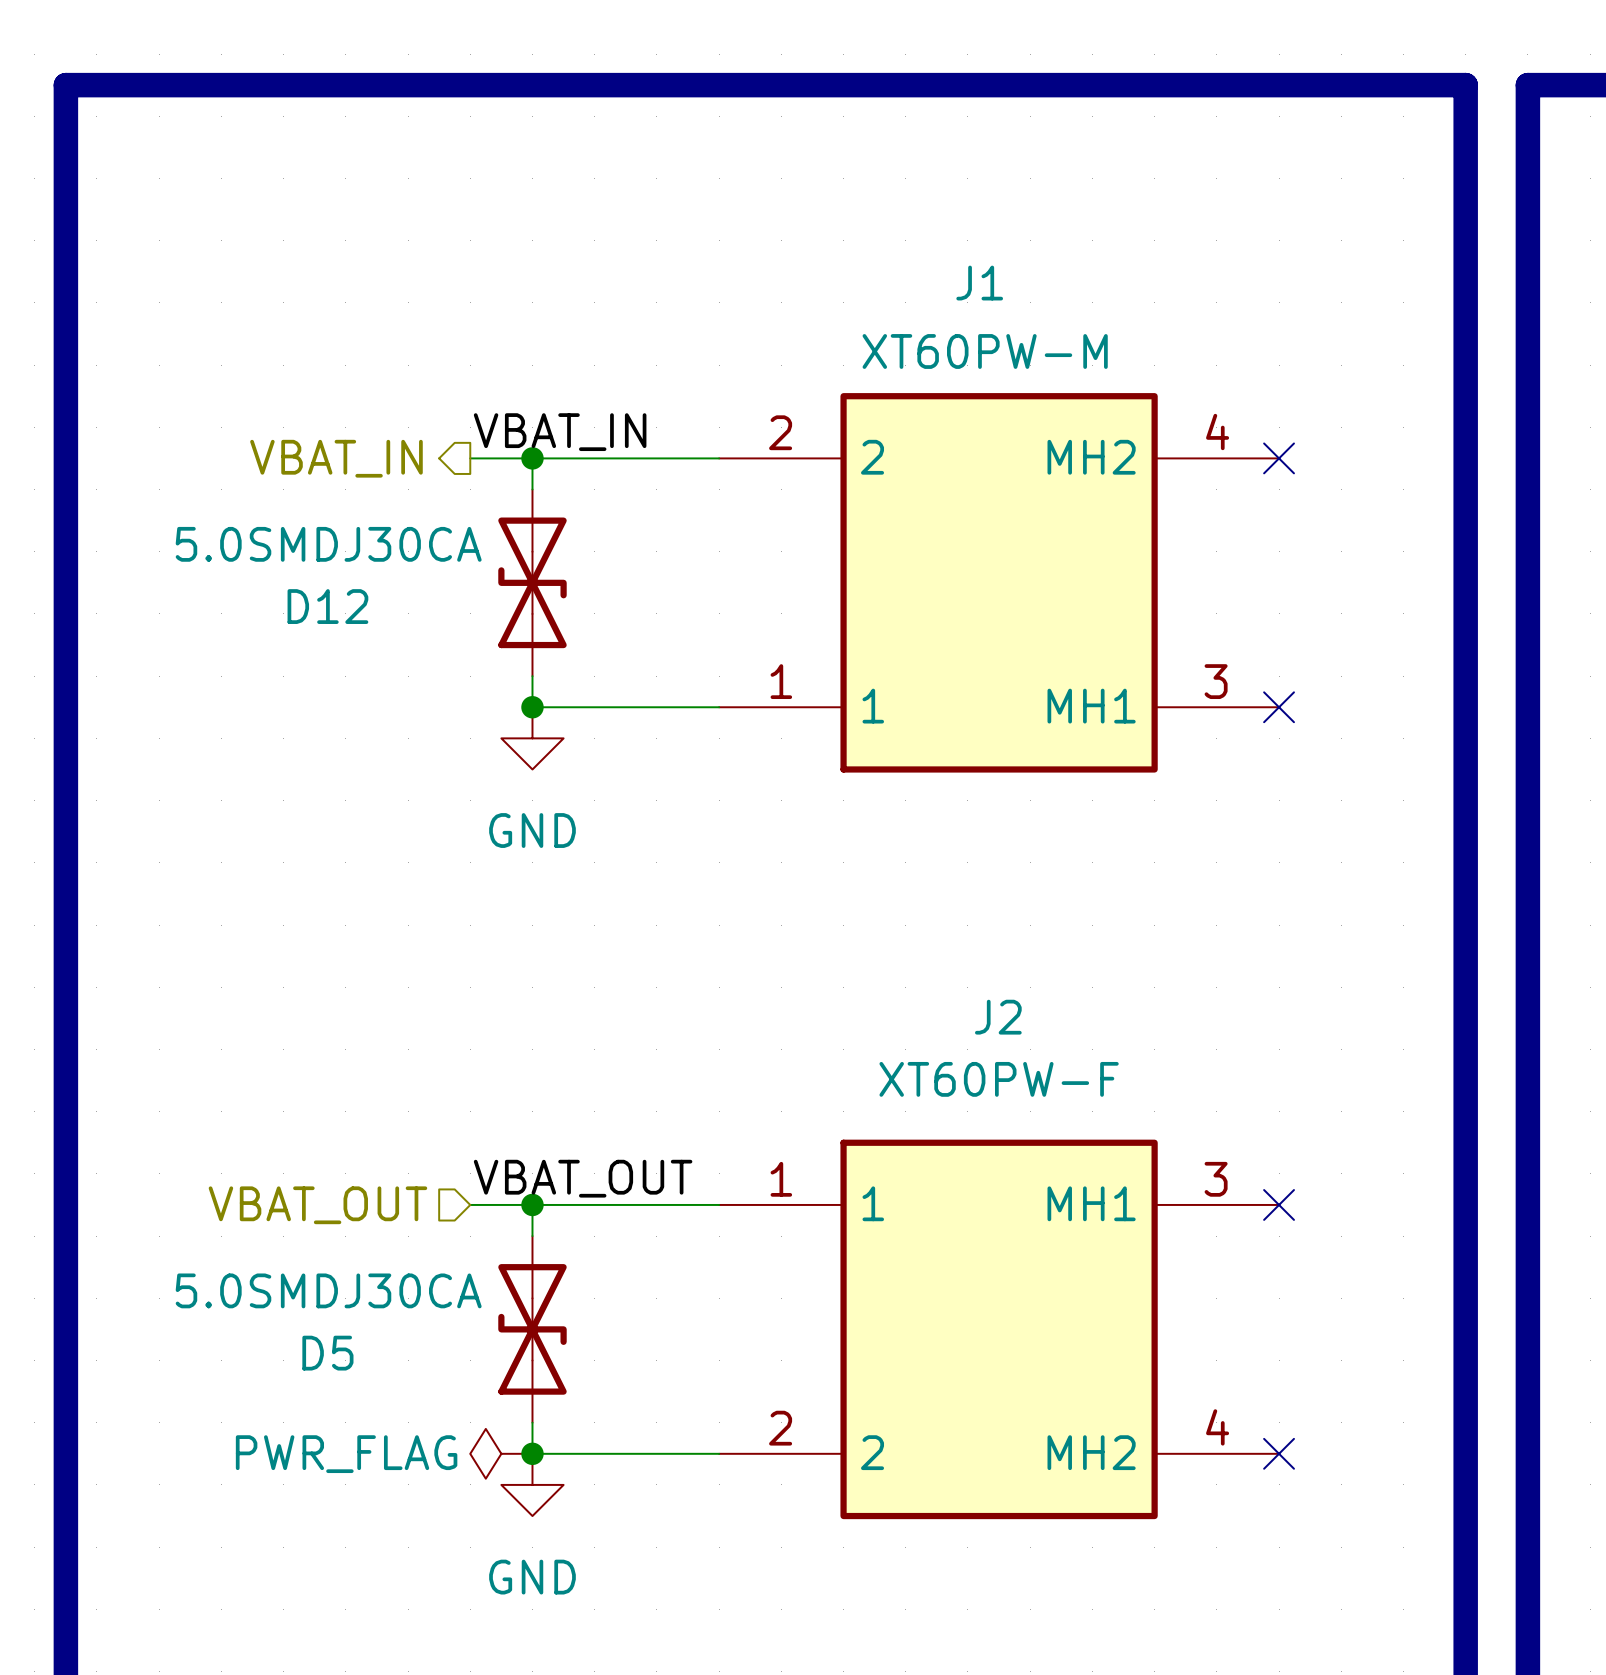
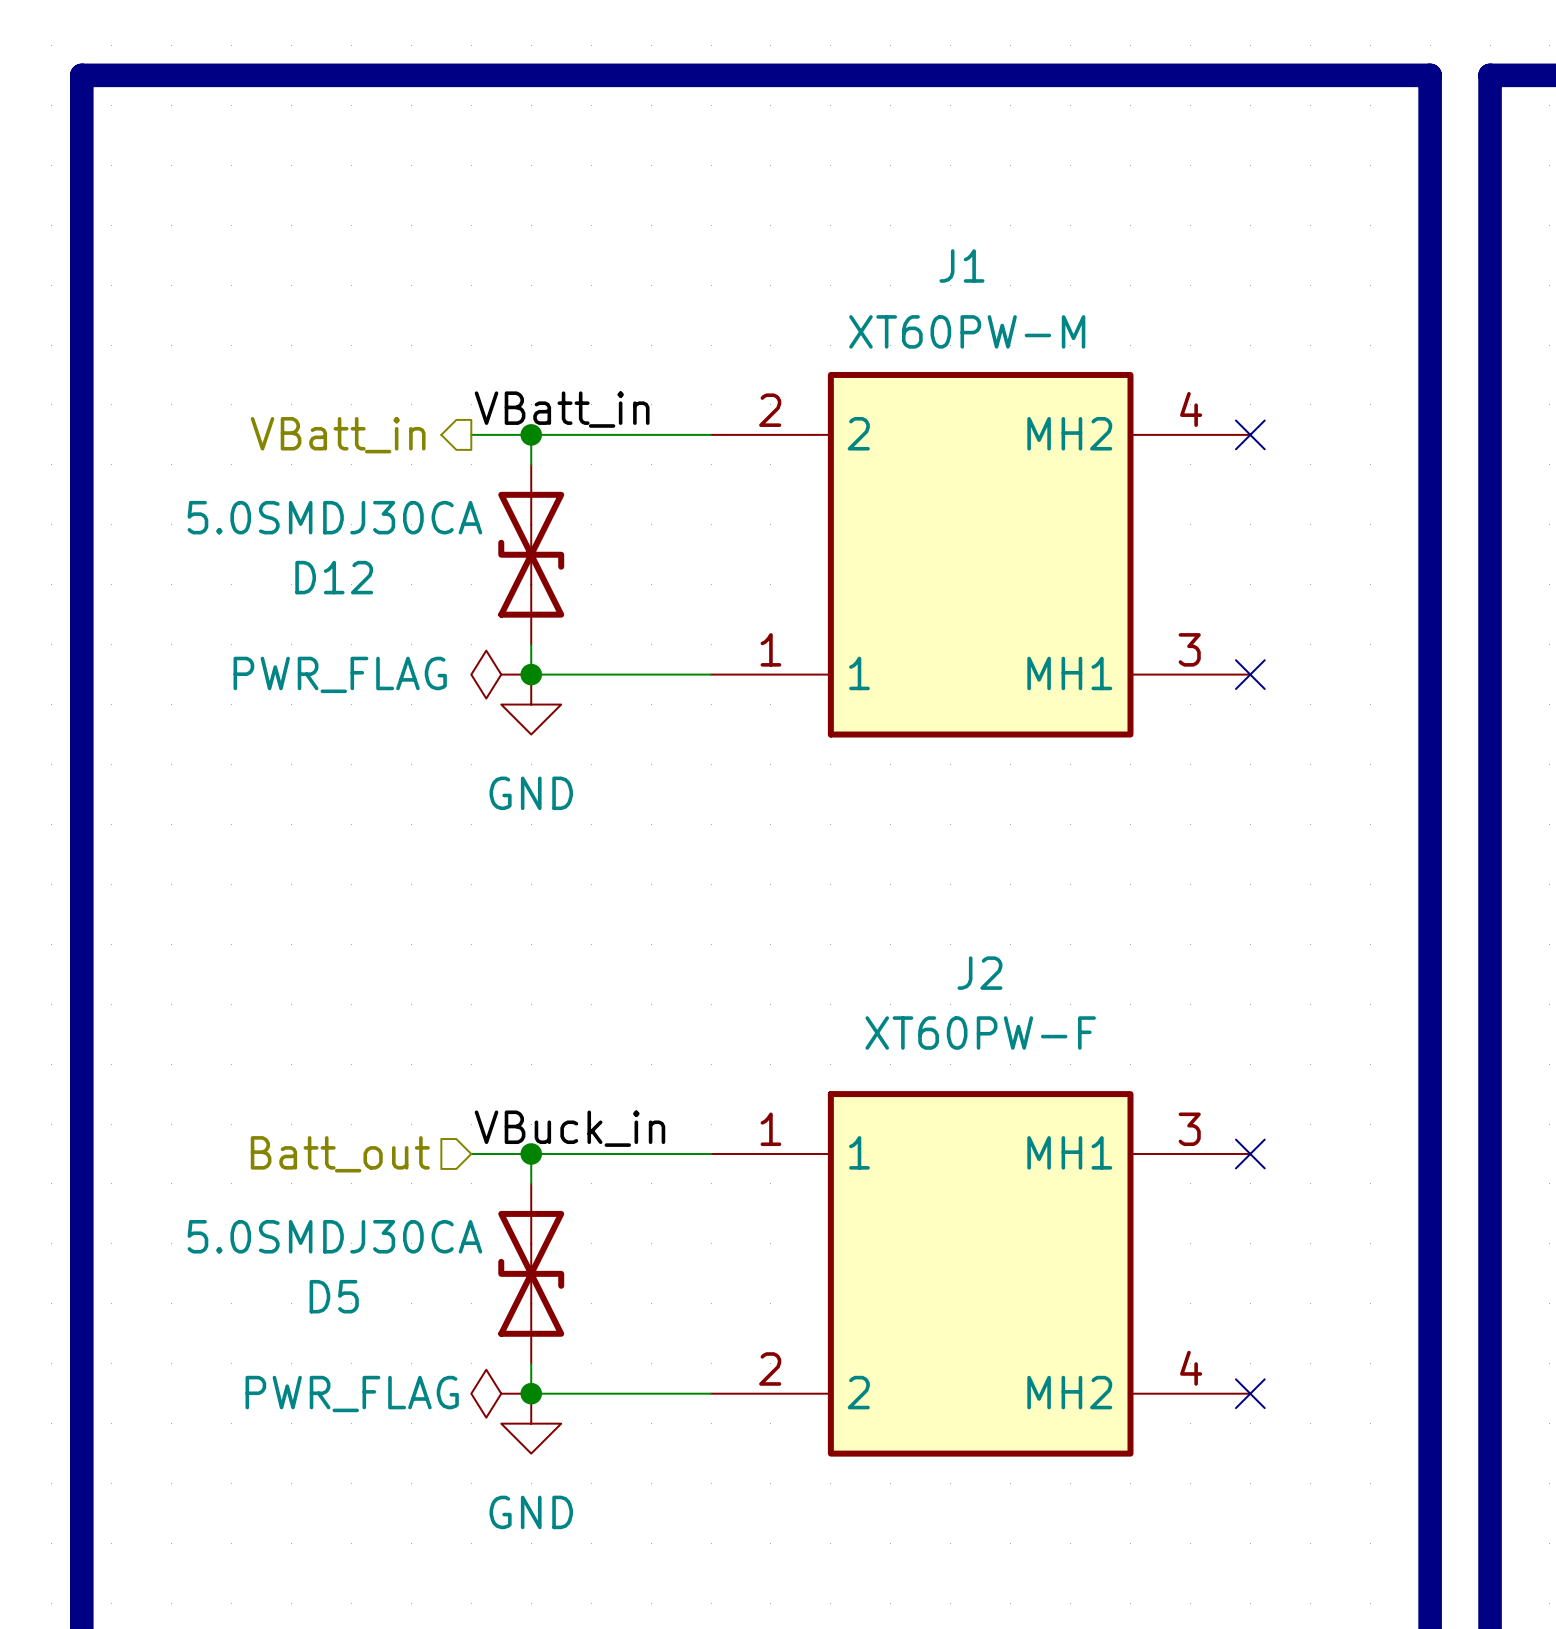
label: VBAT_IN (560, 432) -> VBatt_in (562, 409)
hierarchical label: VBAT_IN (336, 458) -> VBatt_in (338, 435)
power symbol: none -> PWR_FLAG (501, 674)
label: VBAT_OUT (583, 1178) -> VBuck_in (569, 1128)
hierarchical label: VBAT_OUT (317, 1205) -> Batt_out (340, 1154)

